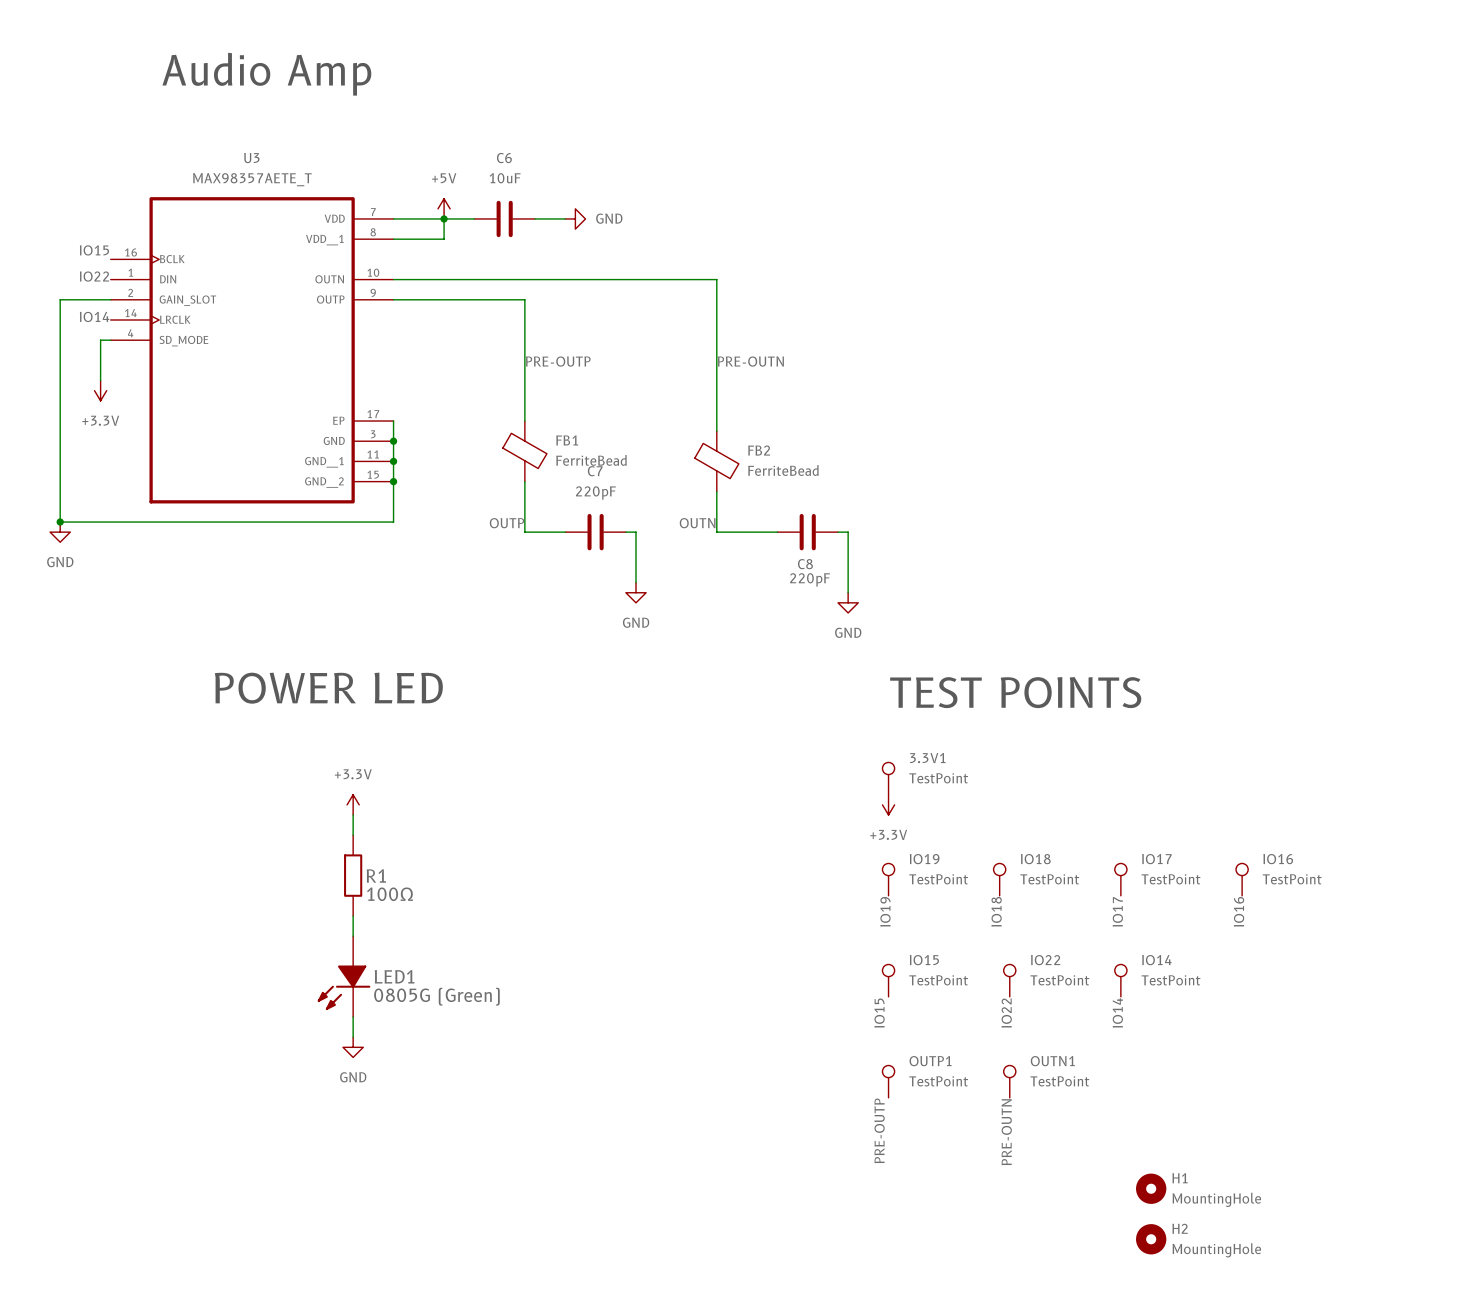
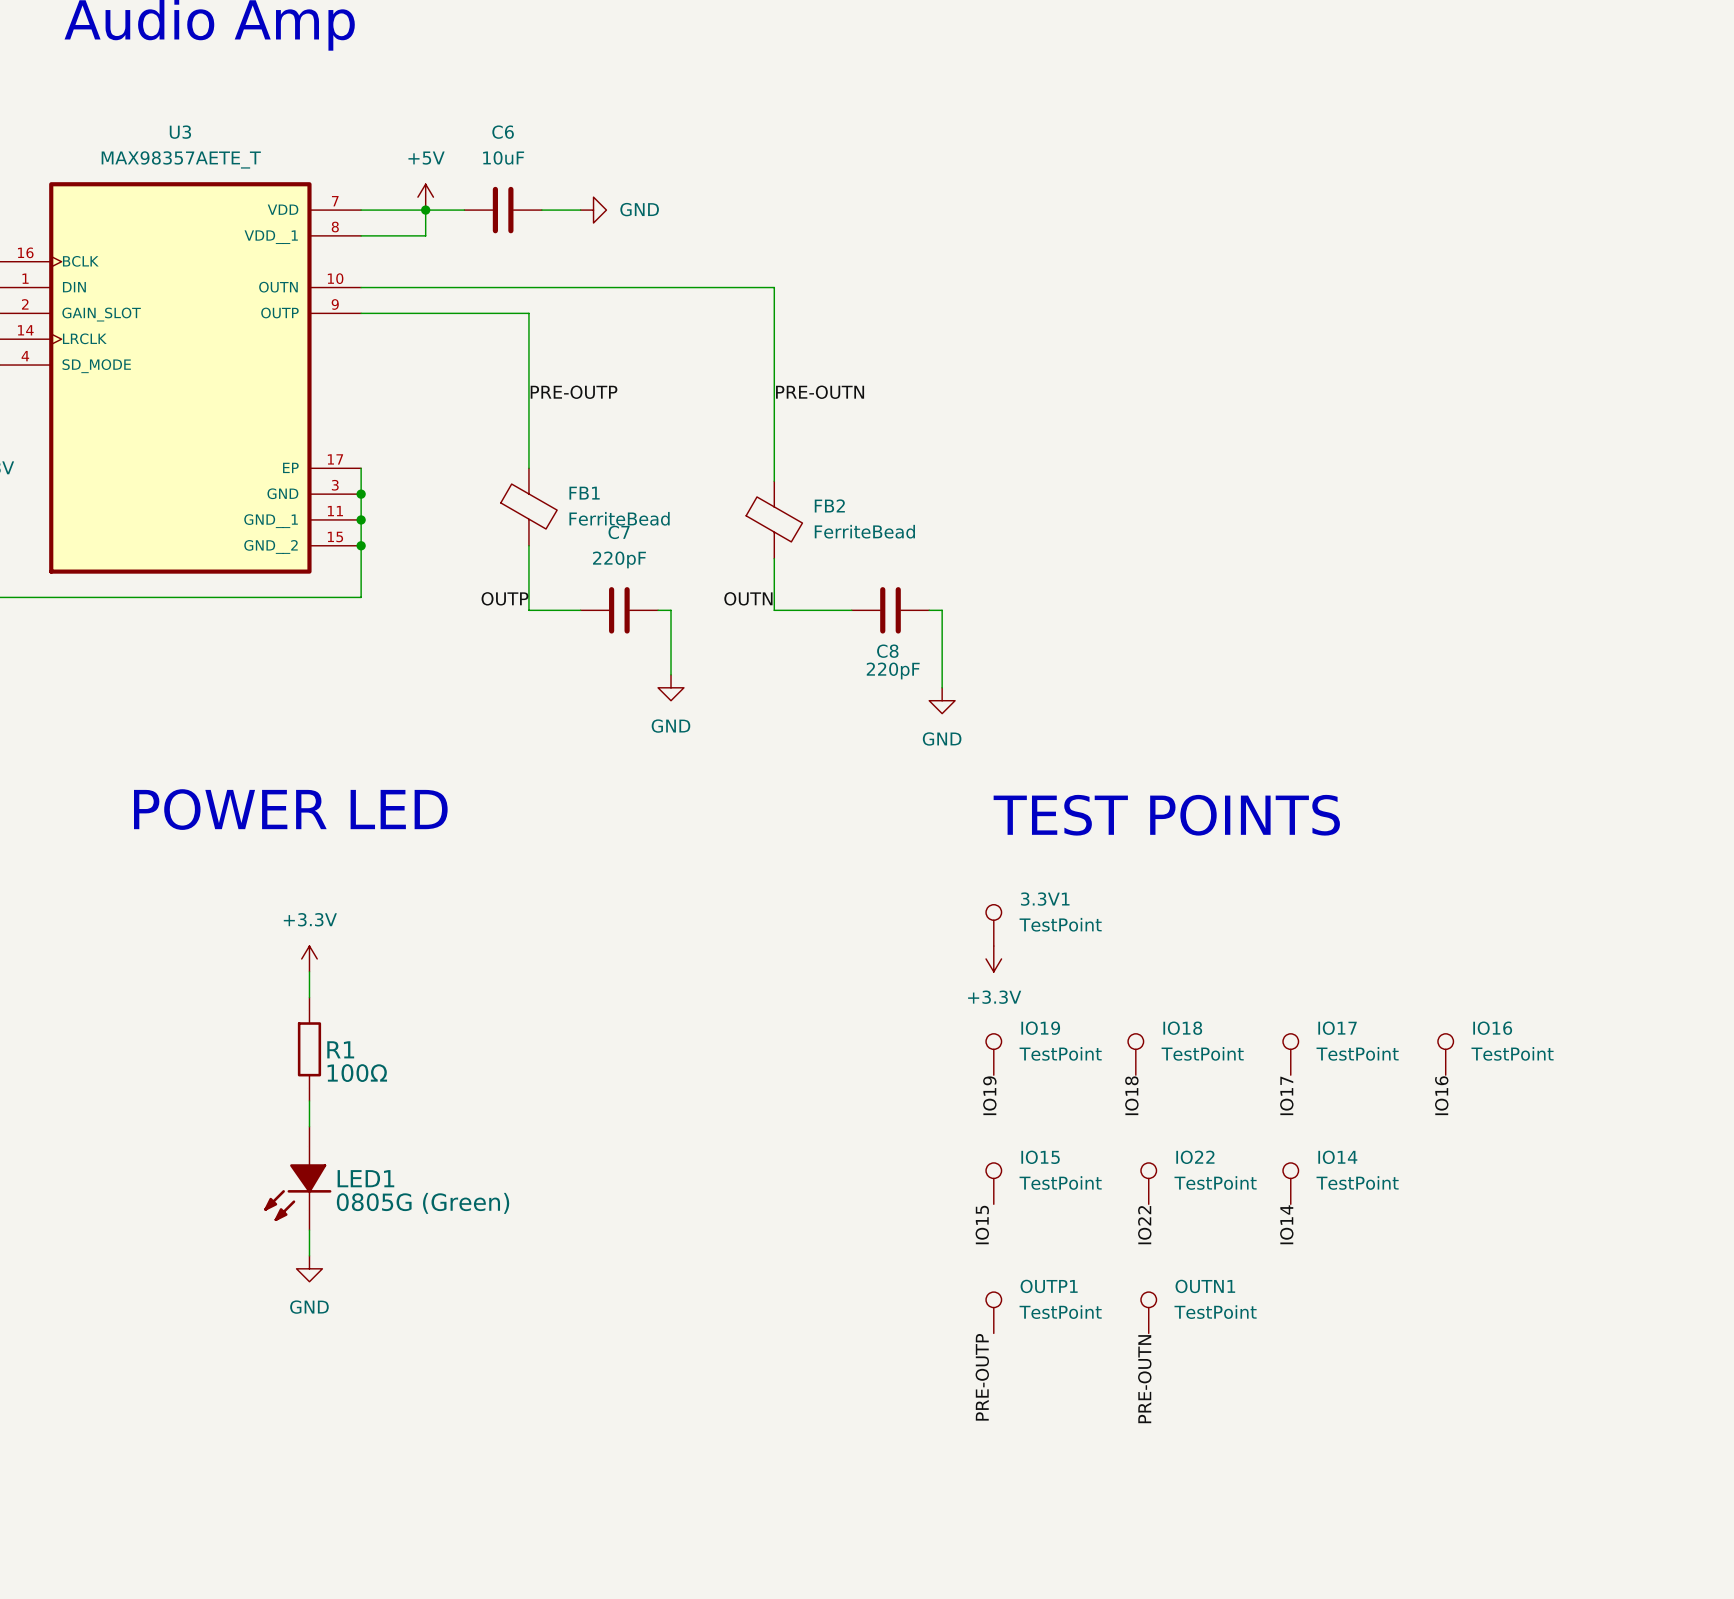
H1: MountingHole (1151, 1188) -> none
H2: MountingHole (1151, 1239) -> none

